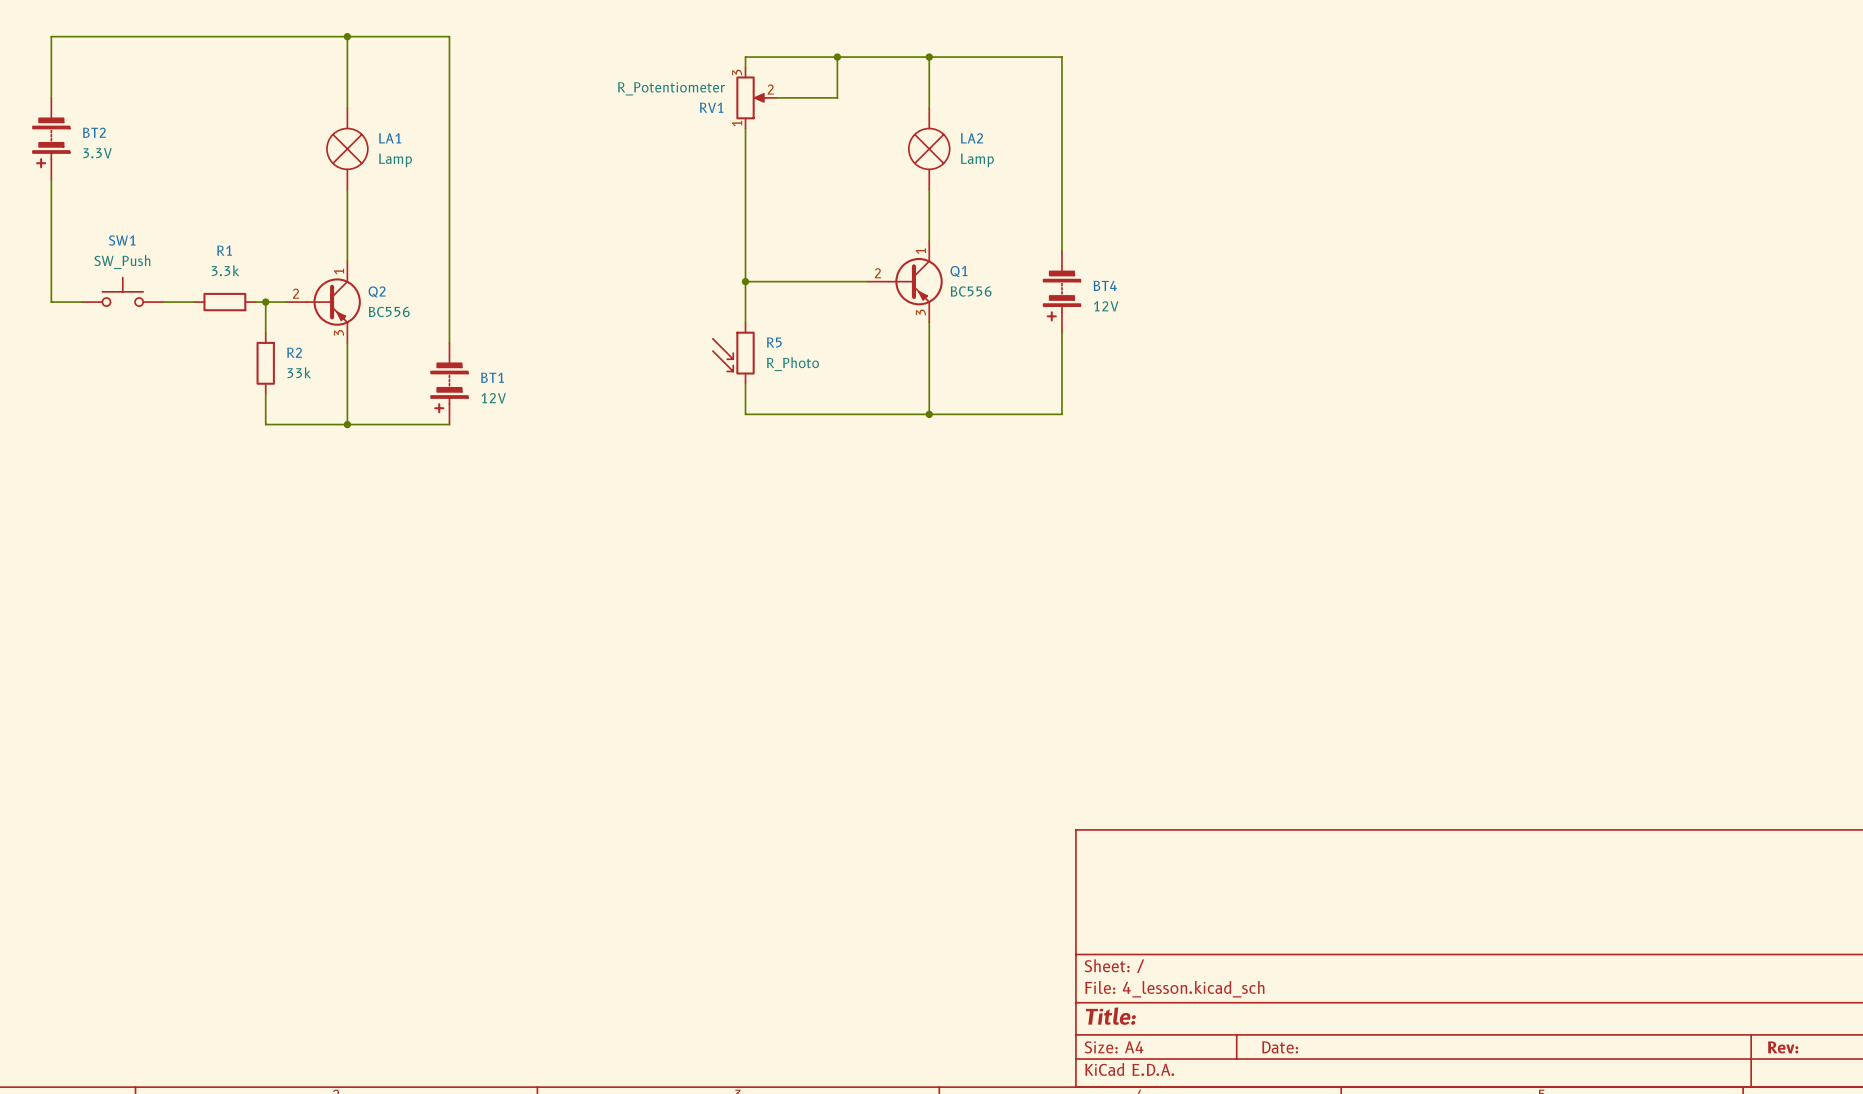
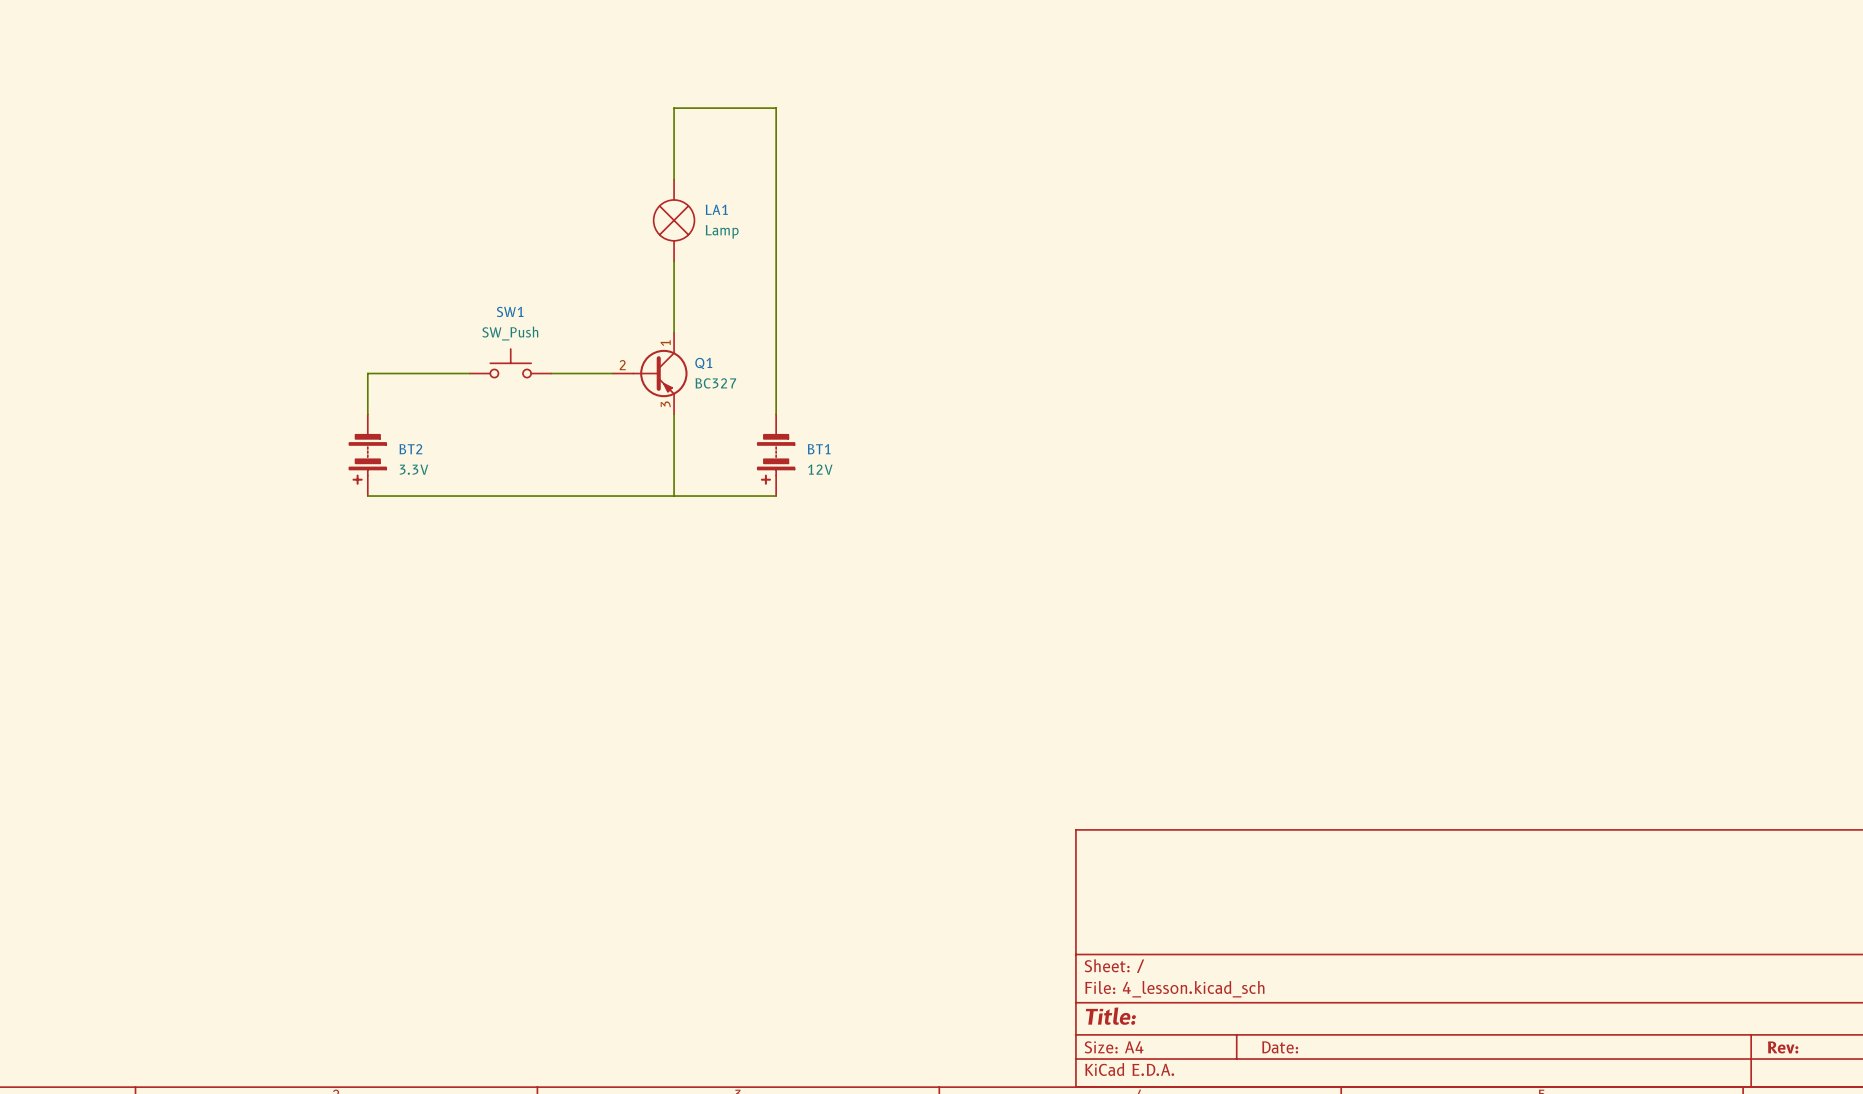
wire: (347, 36) (347, 108) -> none
junction: (347, 36) -> none
wire: (837, 57) (837, 97) (776, 97) -> none
junction: (837, 57) -> none
wire: (929, 57) (929, 108) -> none
junction: (929, 57) -> none
wire: (745, 67) (745, 57) (1061, 57) (1061, 251) -> none
wire: (51, 97) (51, 36) (449, 36) (449, 342) -> none
RV1: R_Potentiometer (756, 97) -> none
wire: (745, 128) (745, 322) -> none
BT2 position: (51, 138) -> (367, 455)
LA1 position: (347, 148) -> (674, 220)
LA2: Lamp (929, 148) -> none
wire: (51, 179) (51, 302) (81, 302) -> none
wire: none -> (674, 179) (674, 108) (776, 108) (776, 414)
wire: (347, 189) (347, 261) -> none
wire: (929, 189) (929, 240) -> none
wire: none -> (674, 261) (674, 332)
wire: (745, 281) (868, 281) -> none
junction: (745, 281) -> none
Q1 position: (905, 281) -> (650, 373)
SW1 position: (122, 291) -> (510, 363)
Q1 value: BC556 (971, 291) -> BC327 (715, 383)
BT4: 12V (1061, 291) -> none
wire: (163, 302) (194, 302) -> none
R1: 3.3k (224, 302) -> none
wire: (255, 302) (286, 302) -> none
wire: (265, 302) (265, 332) -> none
junction: (265, 302) -> none
Q2: BC556 (323, 302) -> none
wire: (929, 322) (929, 414) -> none
wire: (1061, 332) (1061, 414) (745, 414) (745, 383) -> none
wire: (347, 342) (347, 424) -> none
R5: R_Photo (733, 353) -> none
R2: 33k (265, 363) -> none
wire: none -> (469, 373) (367, 373) (367, 414)
wire: none -> (551, 373) (612, 373)
BT1 position: (449, 383) -> (776, 455)
wire: (265, 393) (265, 424) (449, 424) -> none
wire: none -> (674, 414) (674, 496)
junction: (929, 414) -> none
junction: (347, 424) -> none
wire: none -> (367, 496) (776, 496)

